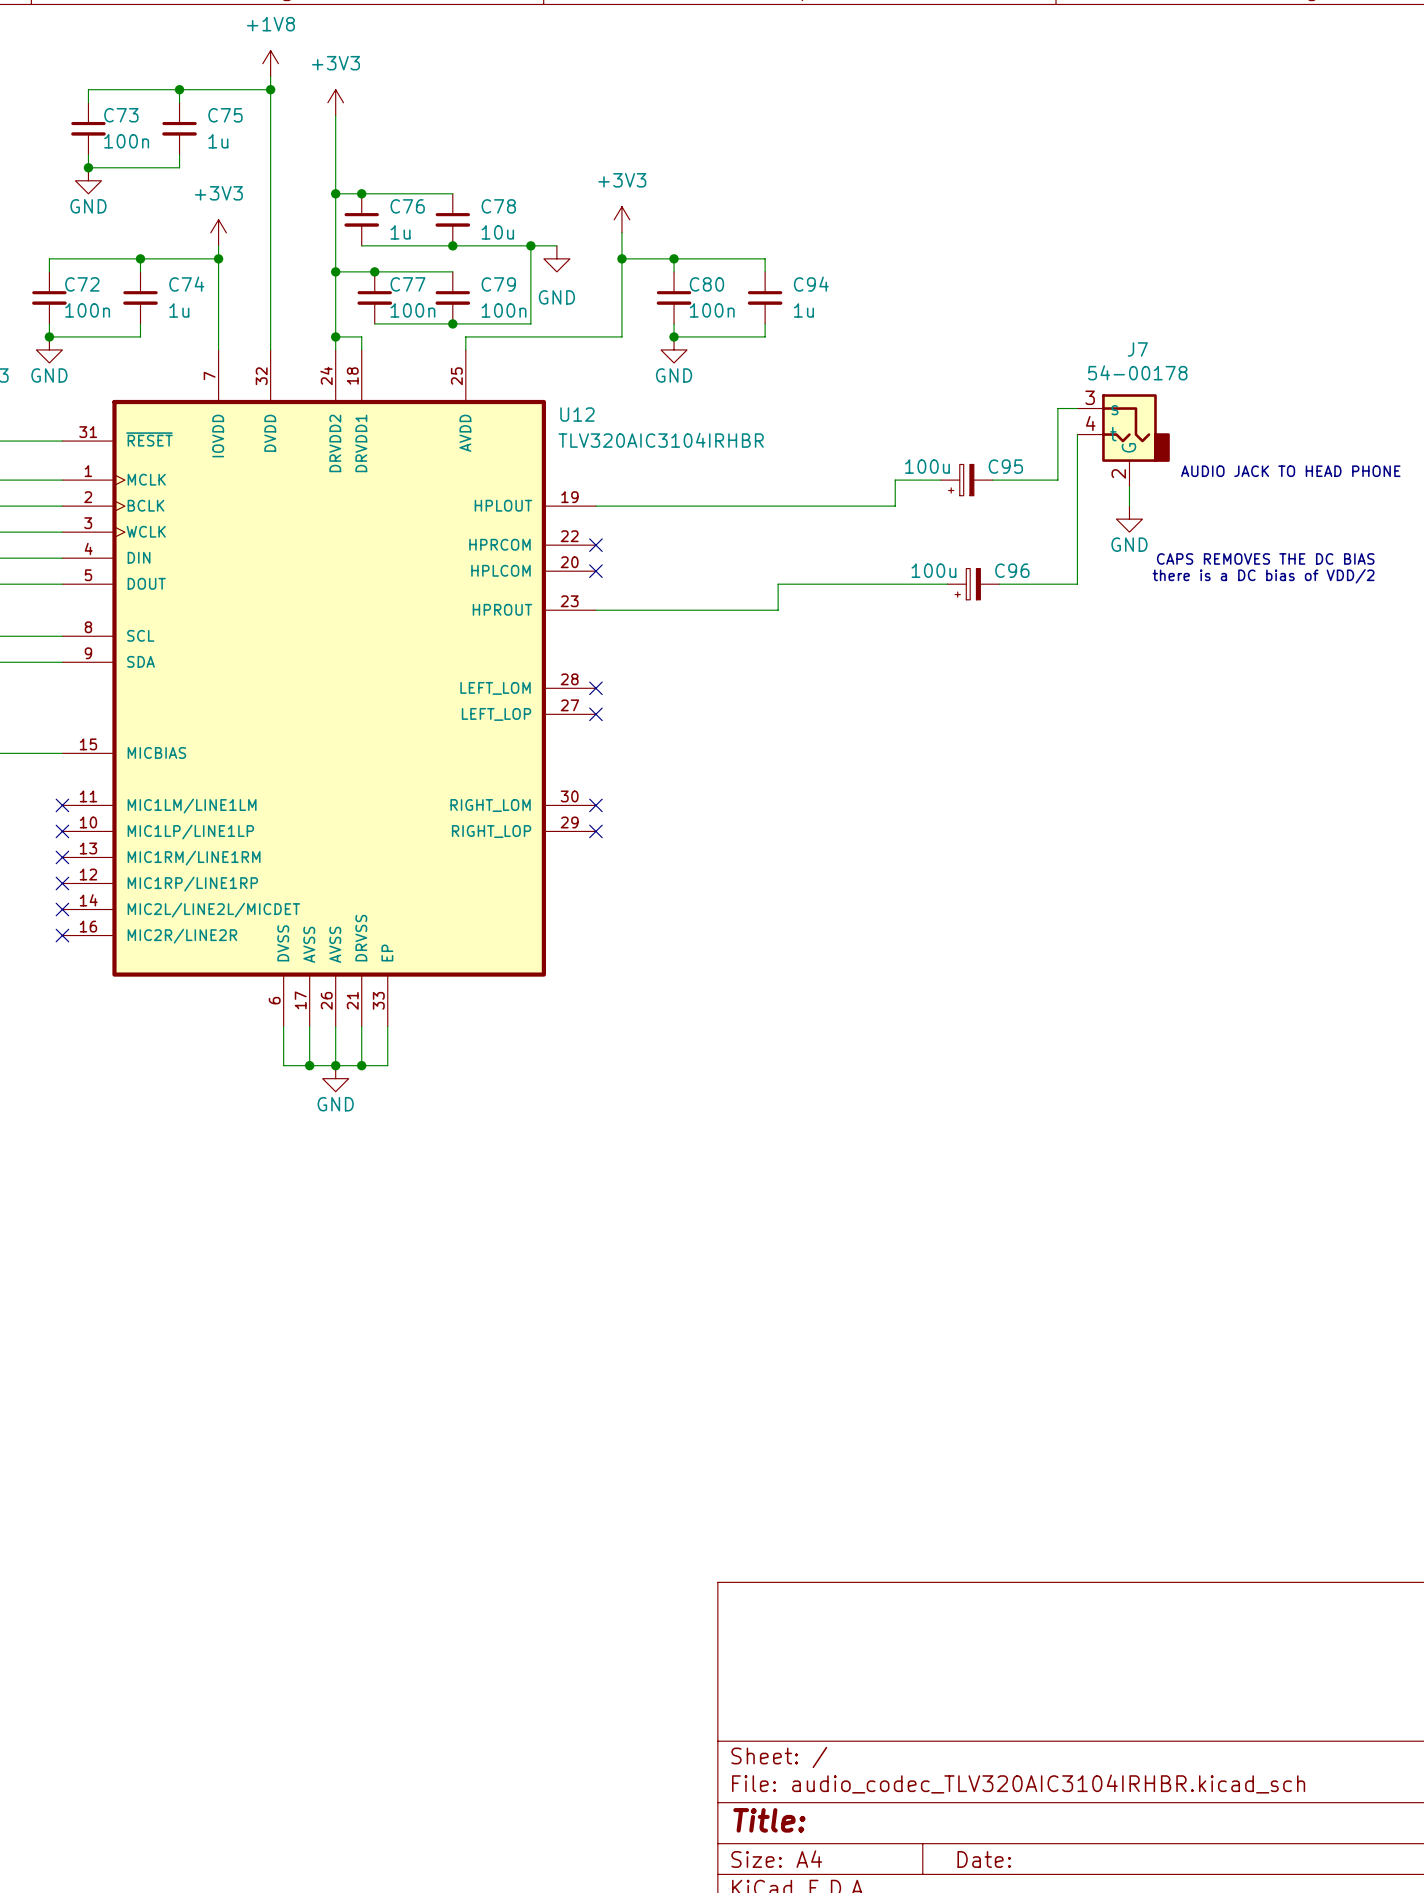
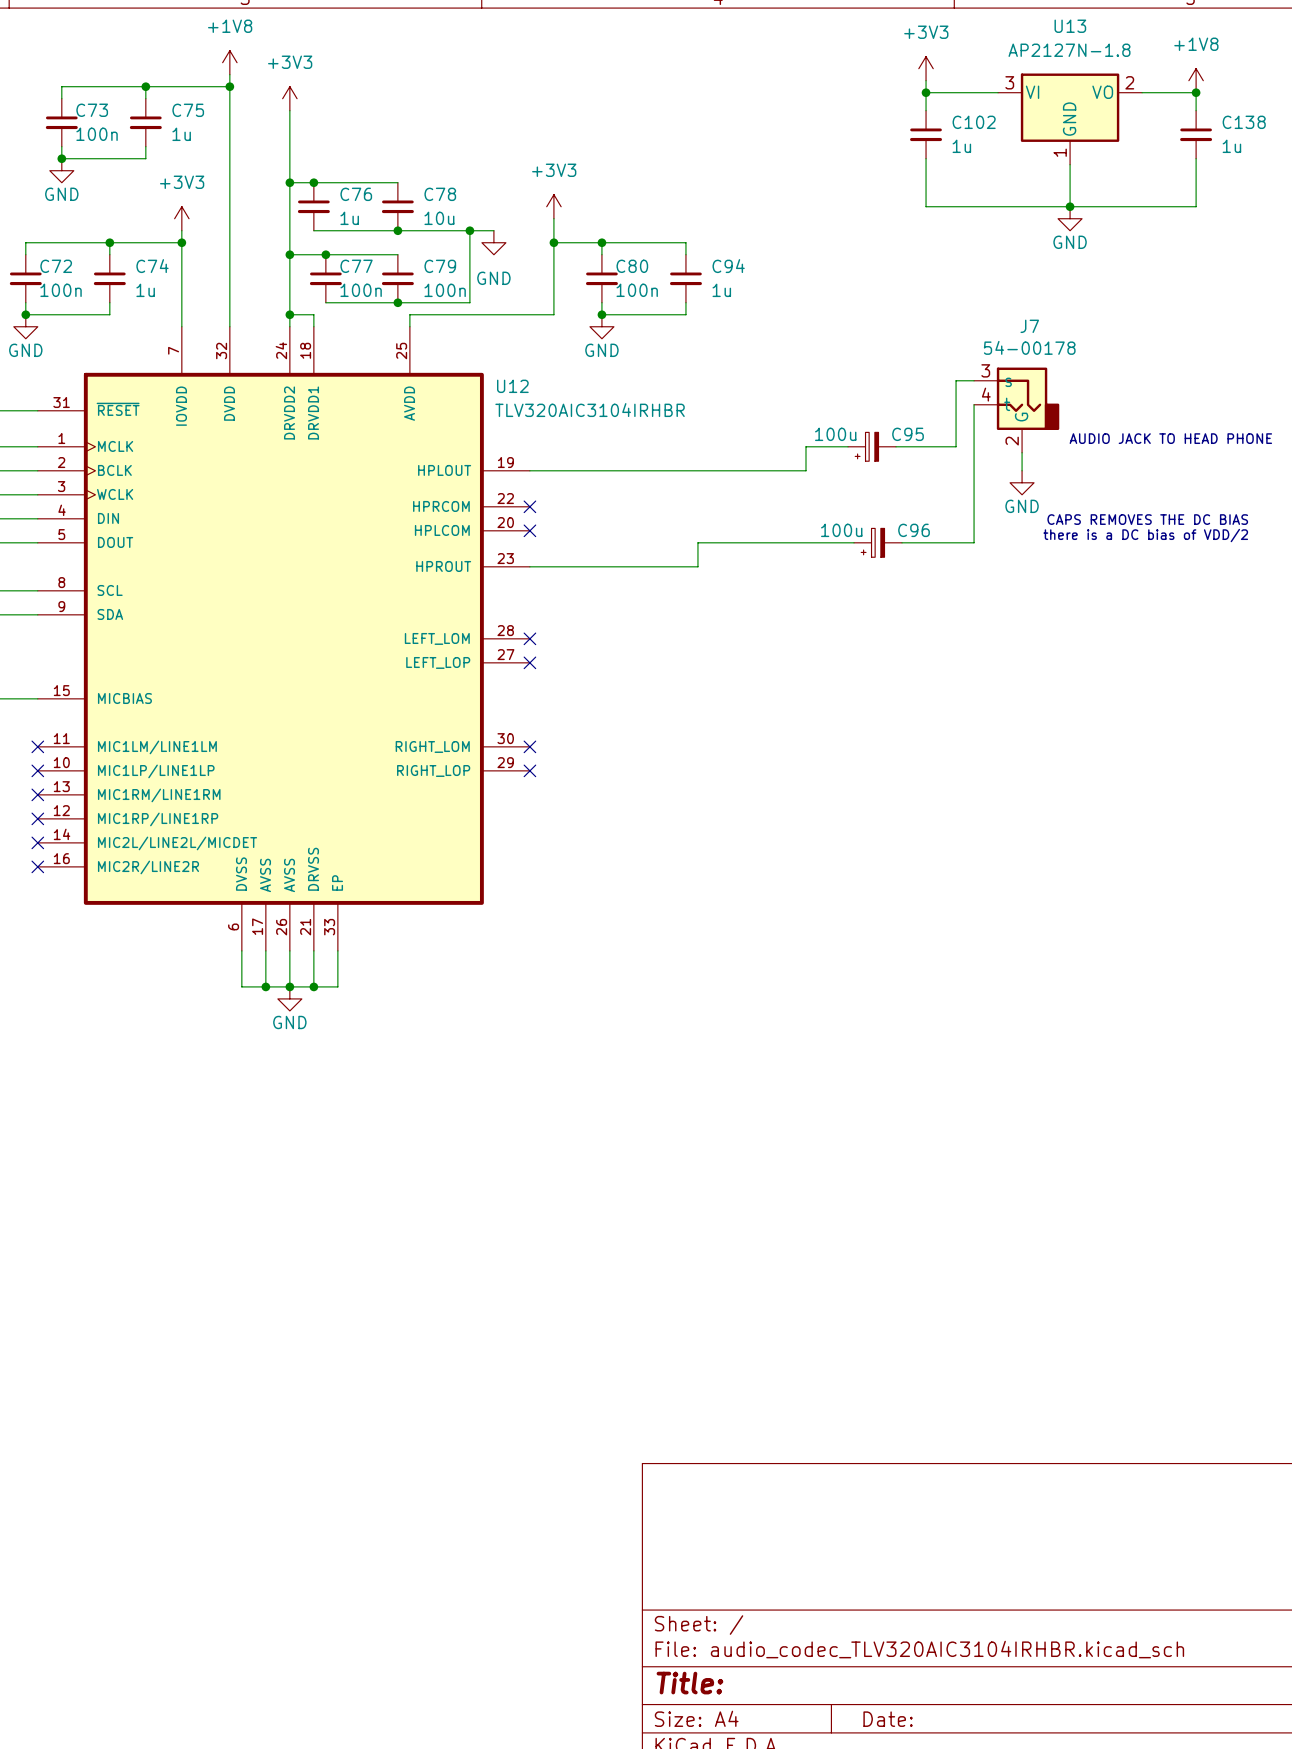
power symbol: none -> +3V3 (926, 68)
wire: none -> (926, 80) (926, 110)
power symbol: none -> +1V8 (1196, 80)
wire: none -> (926, 92) (998, 92)
junction: none -> (926, 92)
wire: none -> (1142, 92) (1196, 92) (1196, 110)
junction: none -> (1196, 92)
U13: none -> AP2127N-1.8 (1070, 119)
C102: none -> 1u (926, 134)
C138: none -> 1u (1196, 134)
wire: none -> (926, 158) (926, 206) (1196, 206) (1196, 158)
wire: none -> (1070, 164) (1070, 206)
junction: none -> (1070, 206)
power symbol: none -> GND (1070, 218)

